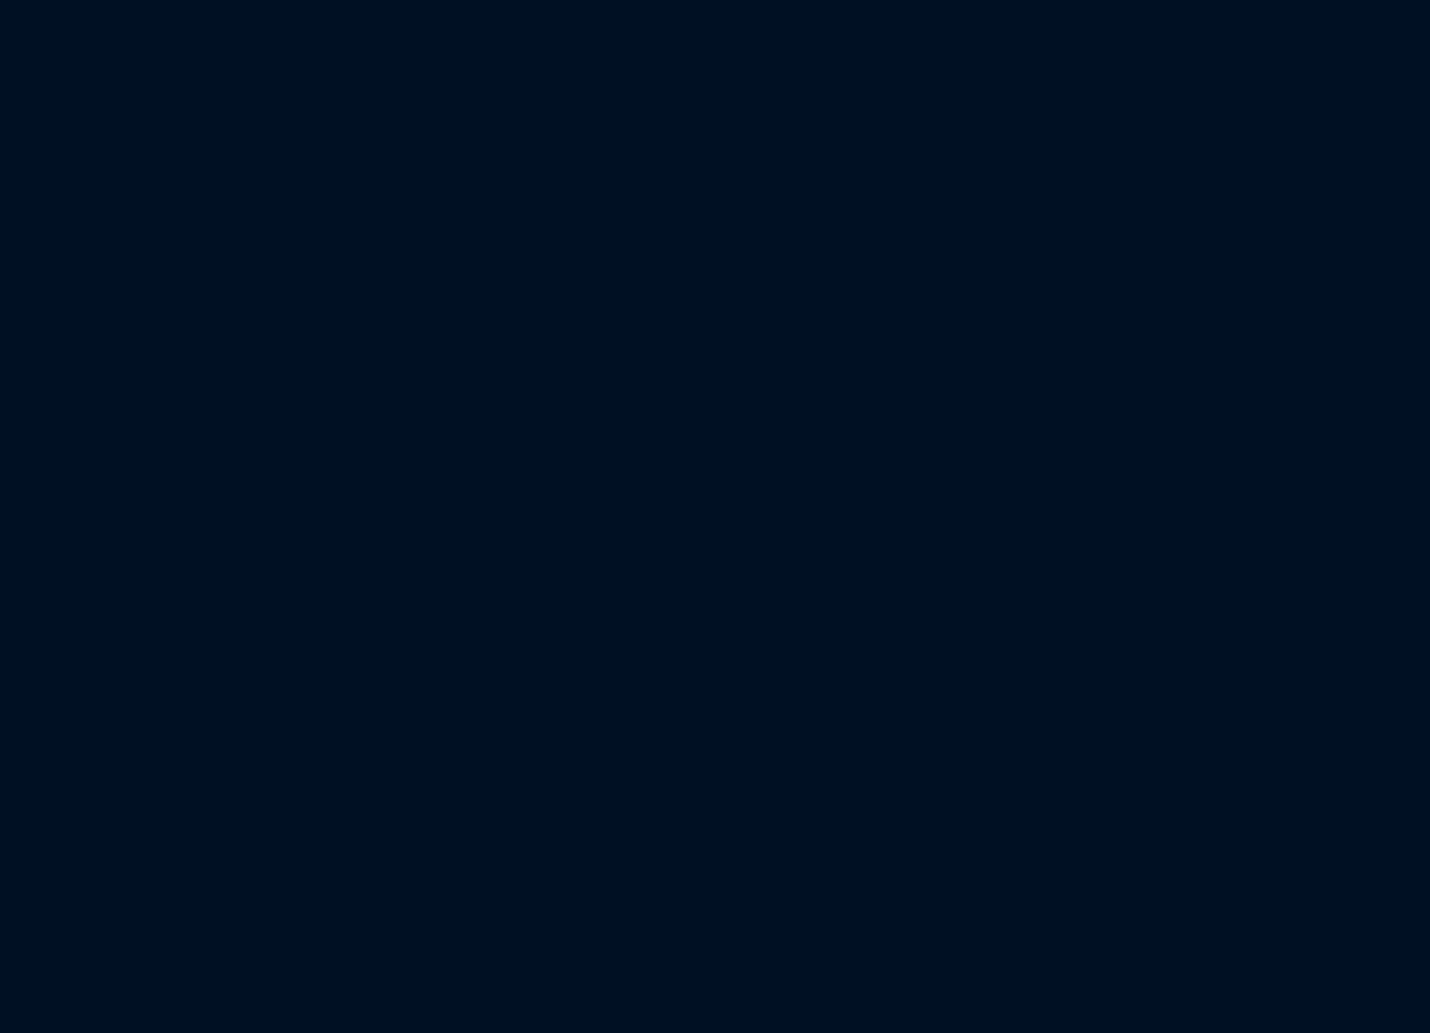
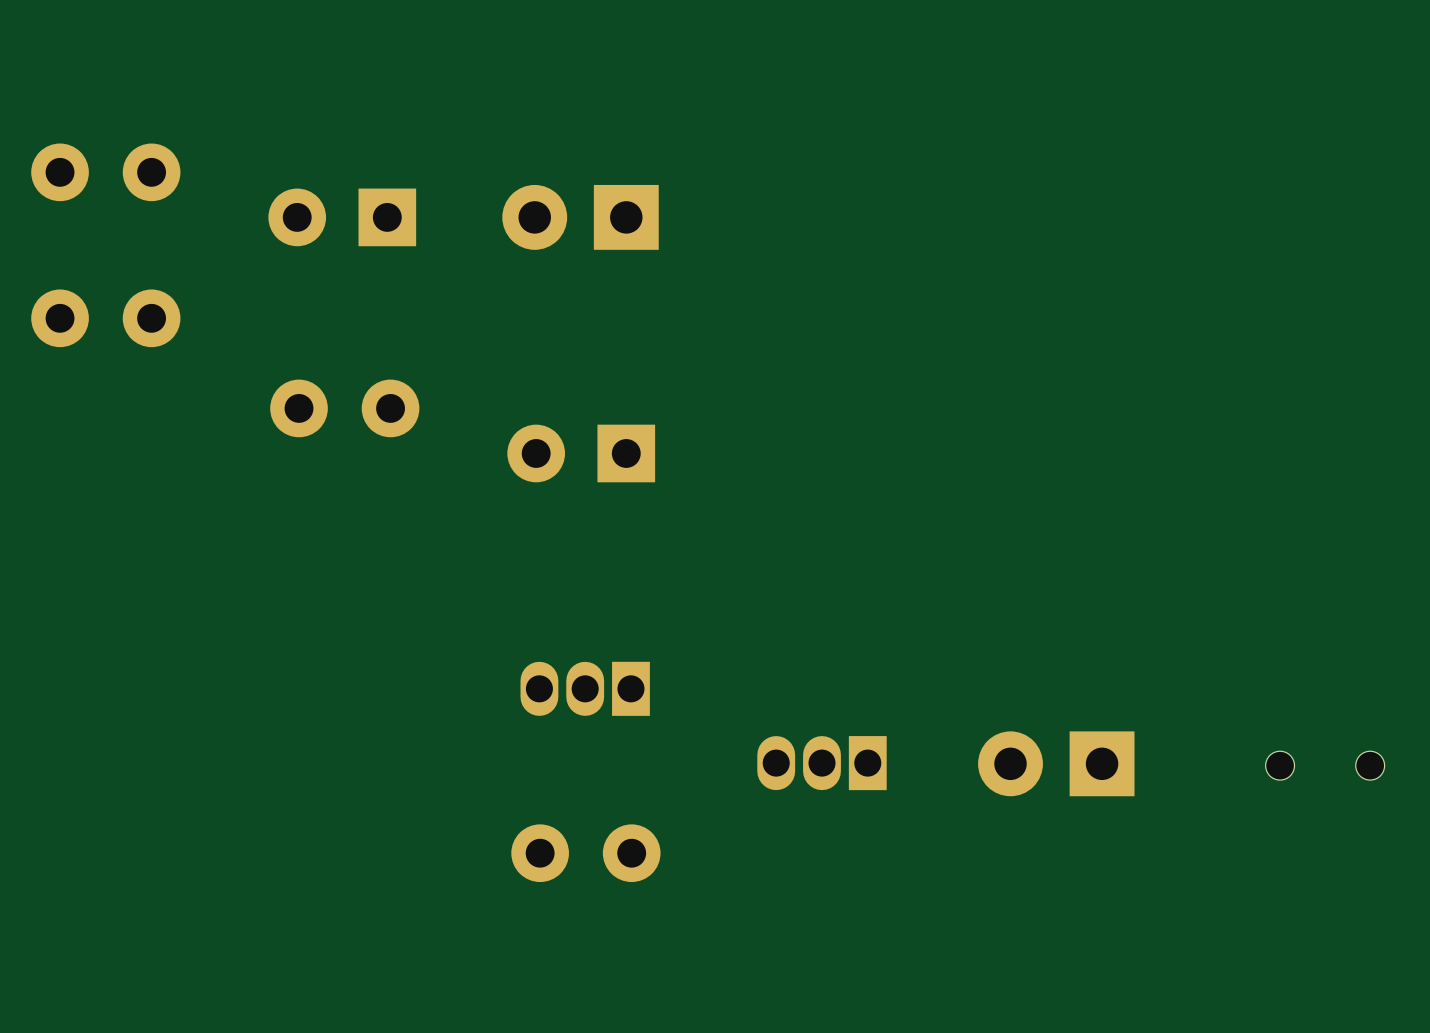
part: none -> (105, 172)
part: none -> (342, 217)
part: none -> (580, 217)
part: none -> (105, 318)
part: none -> (344, 408)
part: none -> (581, 453)
part: none -> (585, 688)
part: none -> (822, 763)
part: none -> (1056, 763)
part: none -> (1325, 765)
part: none -> (585, 853)

